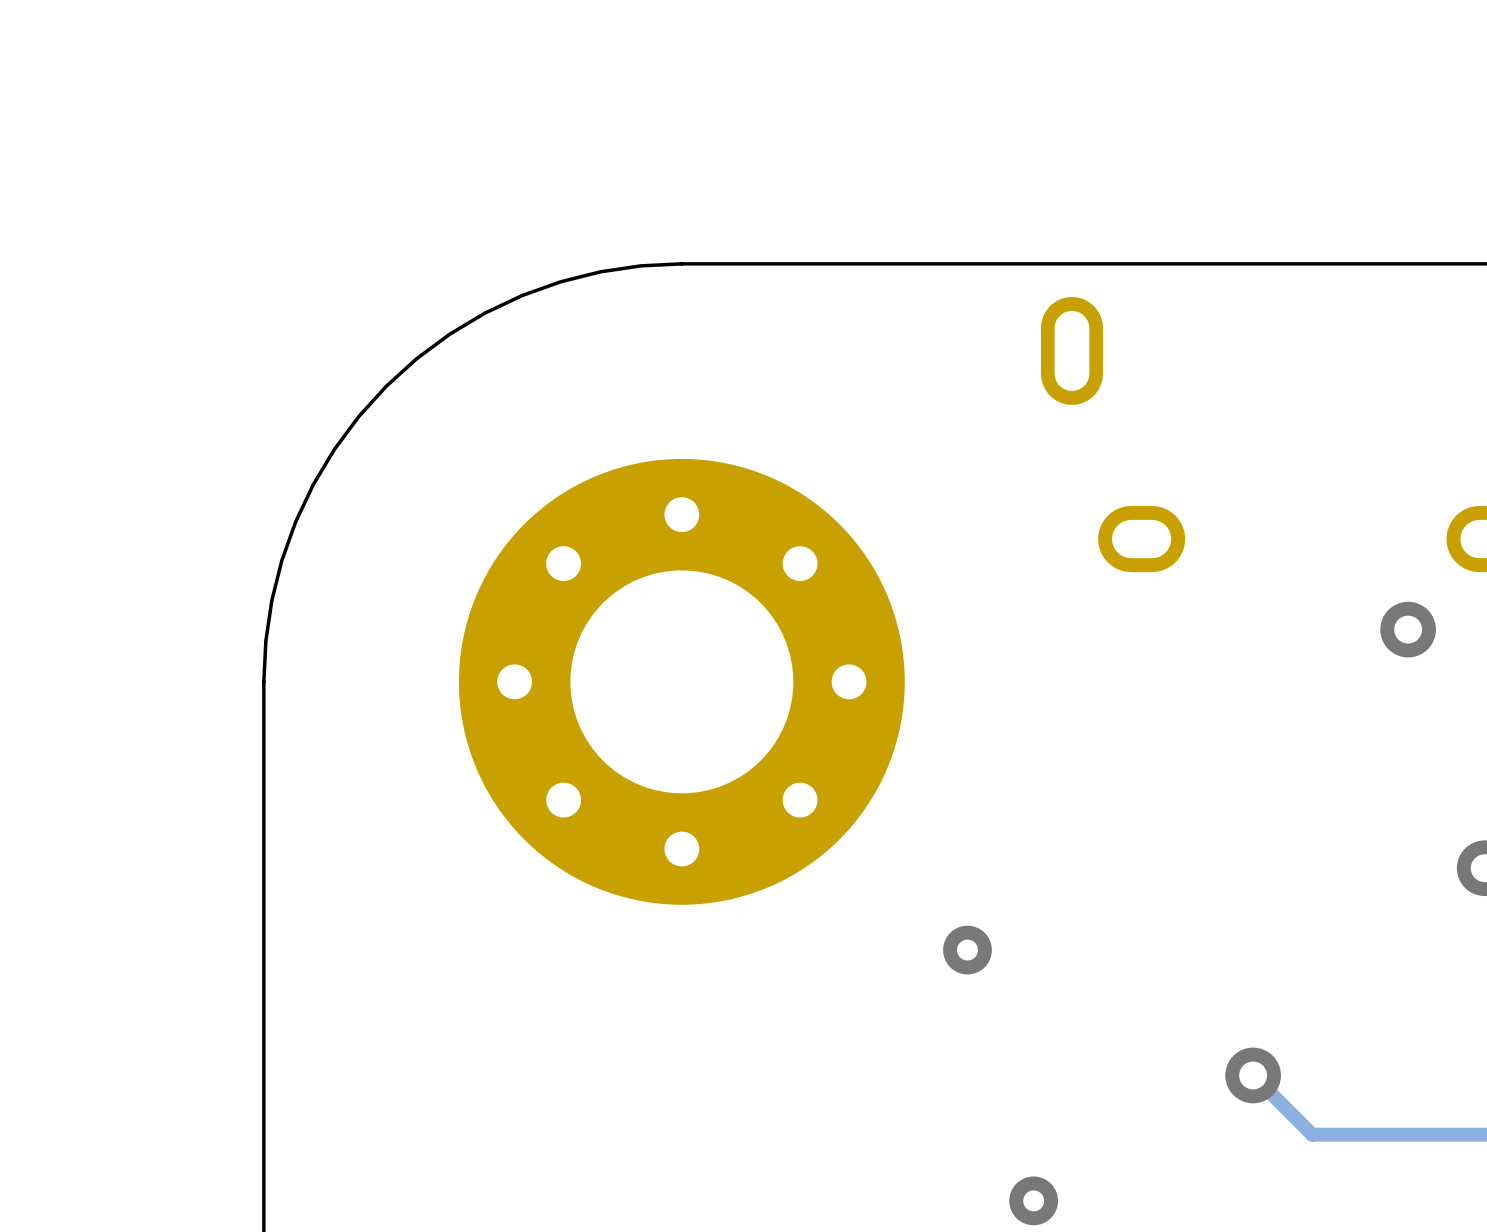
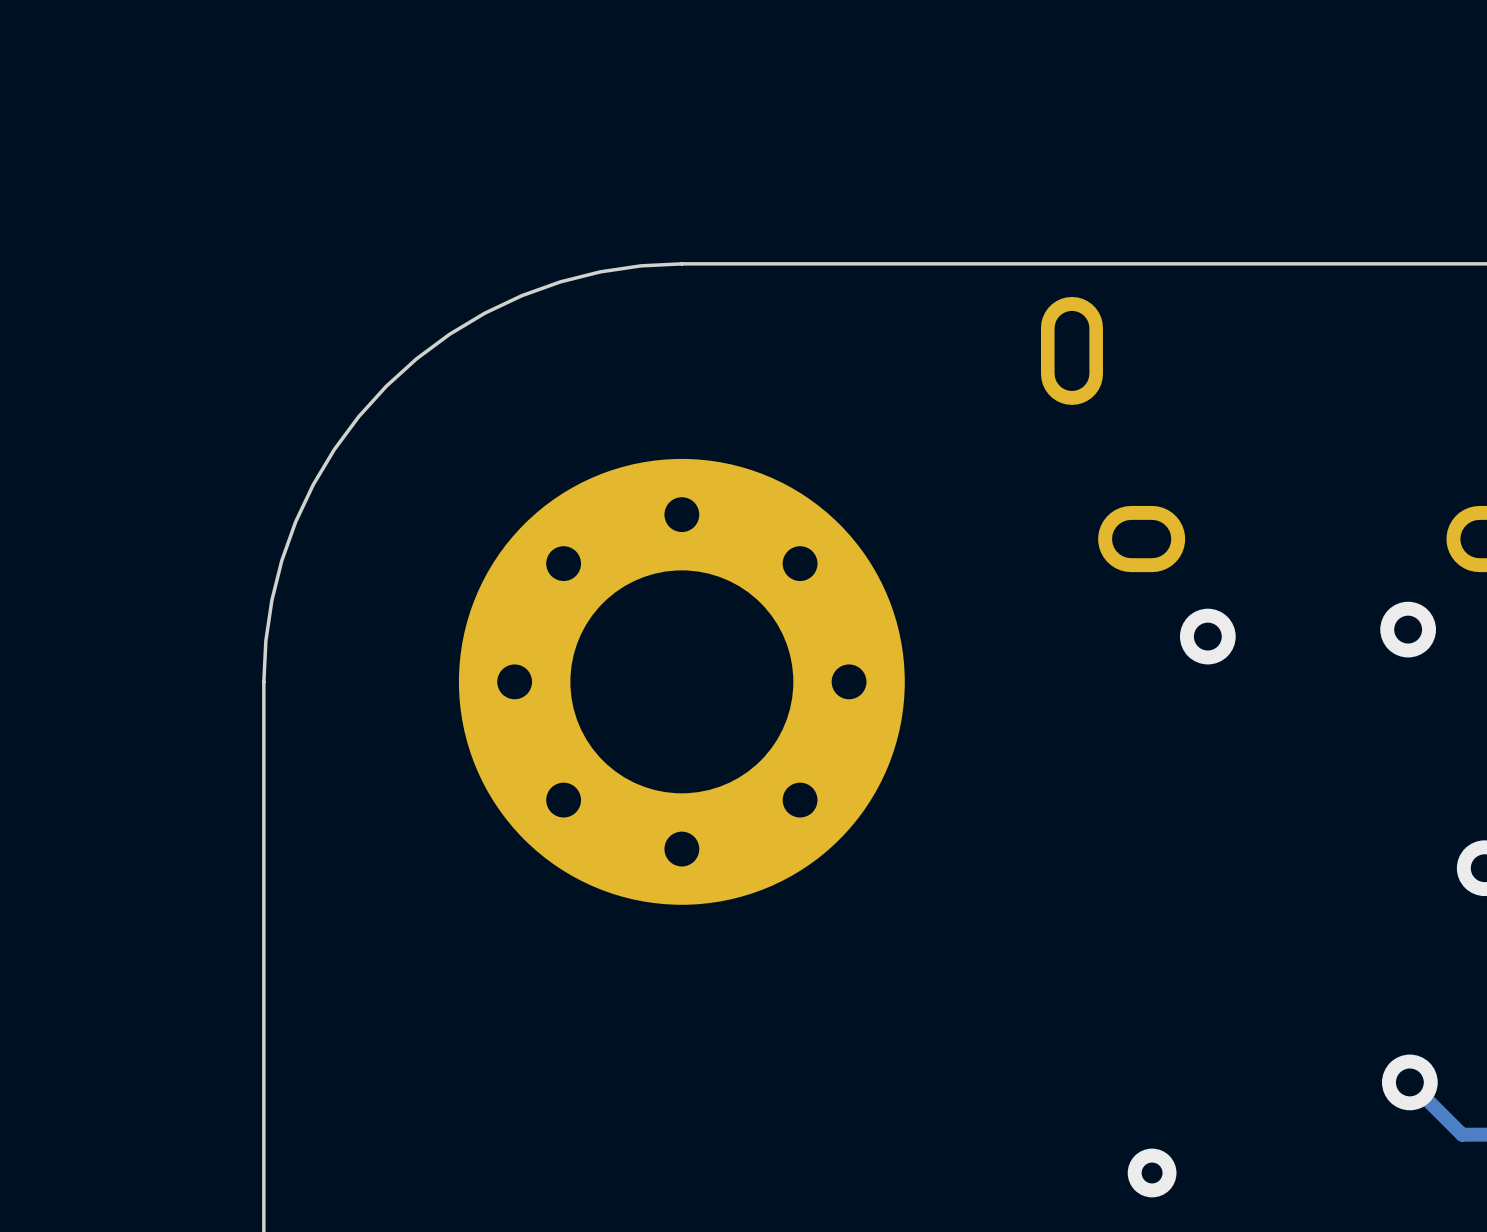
via: none -> (1207, 636)
via: (967, 950) -> none
track: (1253, 1075) (1312, 1134) (1462, 1134) -> (1409, 1082) (1462, 1134)
via position: (1253, 1075) -> (1409, 1082)
via: none -> (1152, 1173)
via: (1033, 1200) -> none

